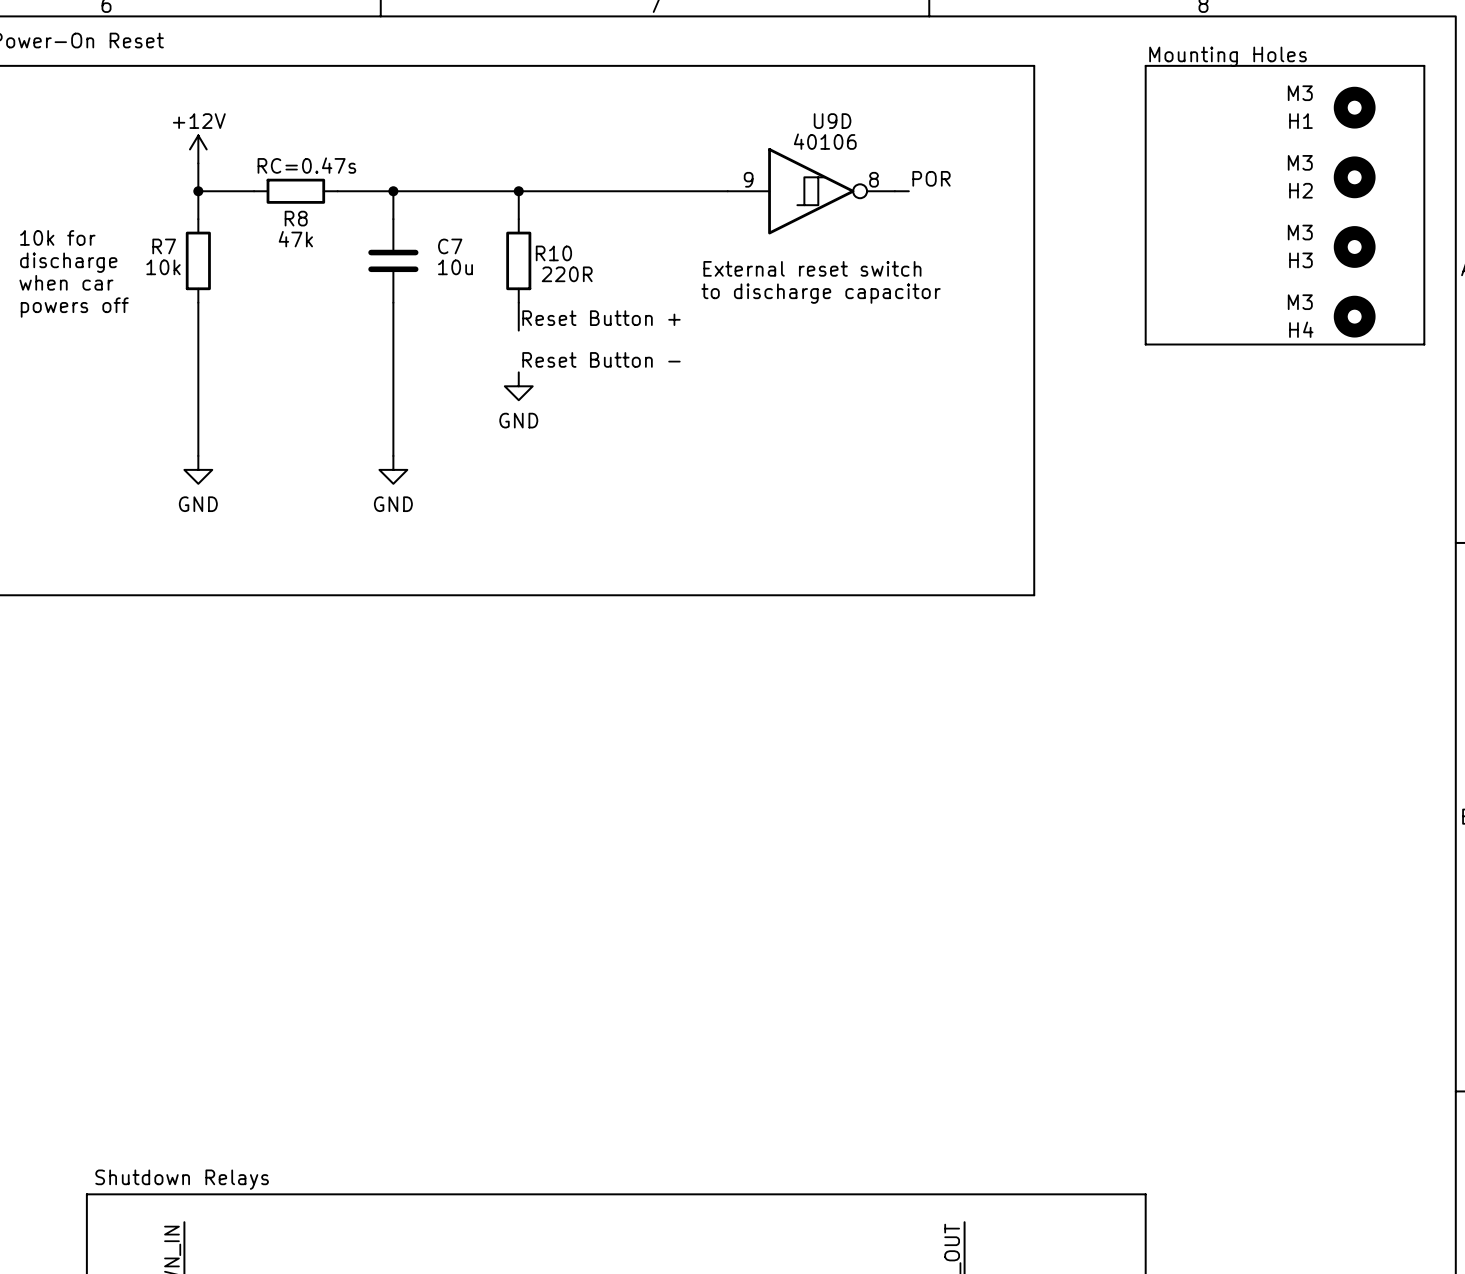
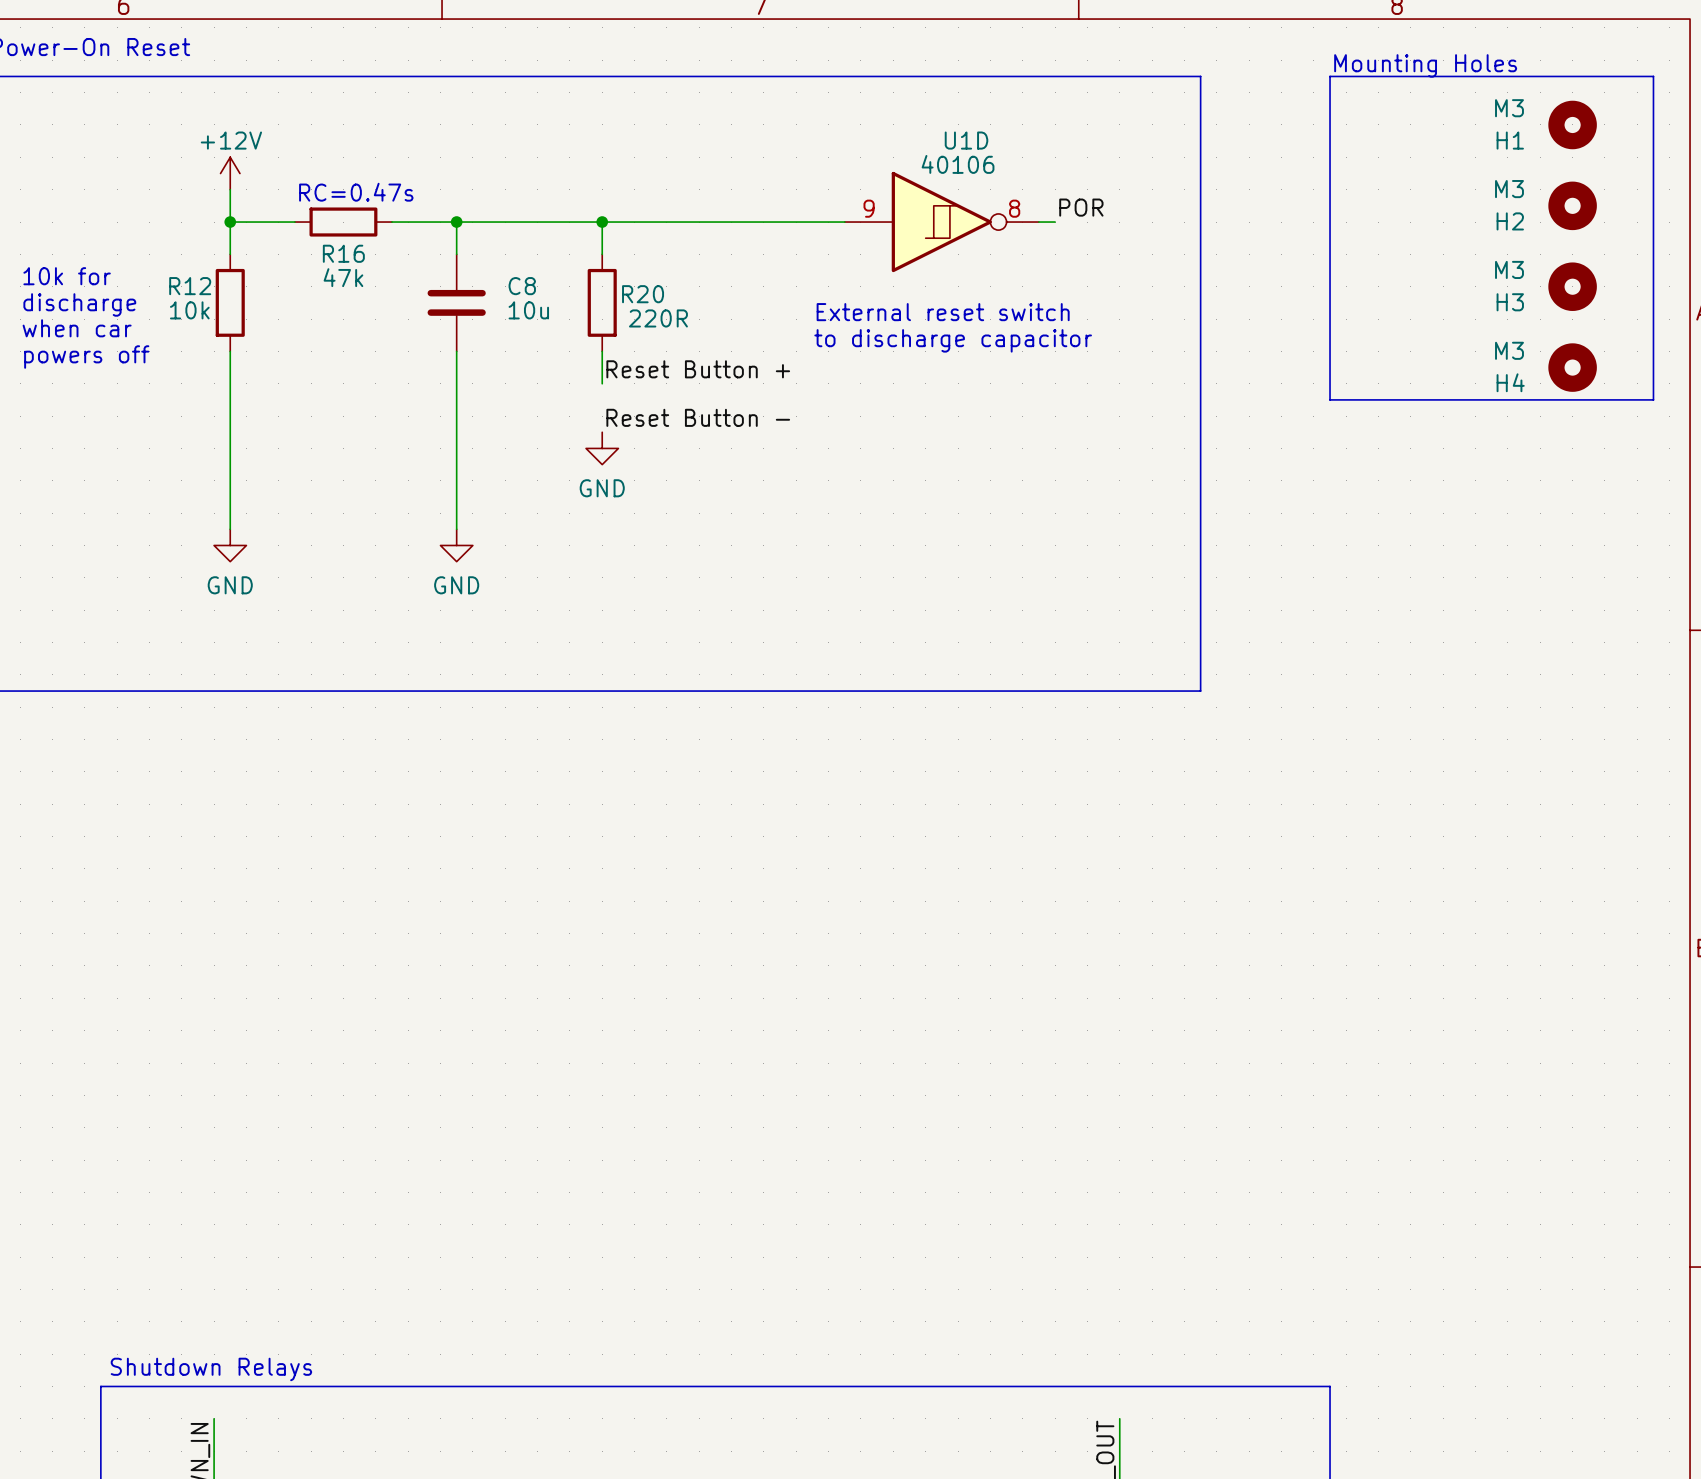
U9D name: U9D (832, 121) -> U1D (966, 140)
R8 name: R8 (296, 218) -> R16 (343, 253)
R7 name: R7 (164, 246) -> R12 (190, 286)
C7 name: C7 (450, 246) -> C8 (522, 286)
R10 name: R10 (553, 253) -> R20 (643, 294)

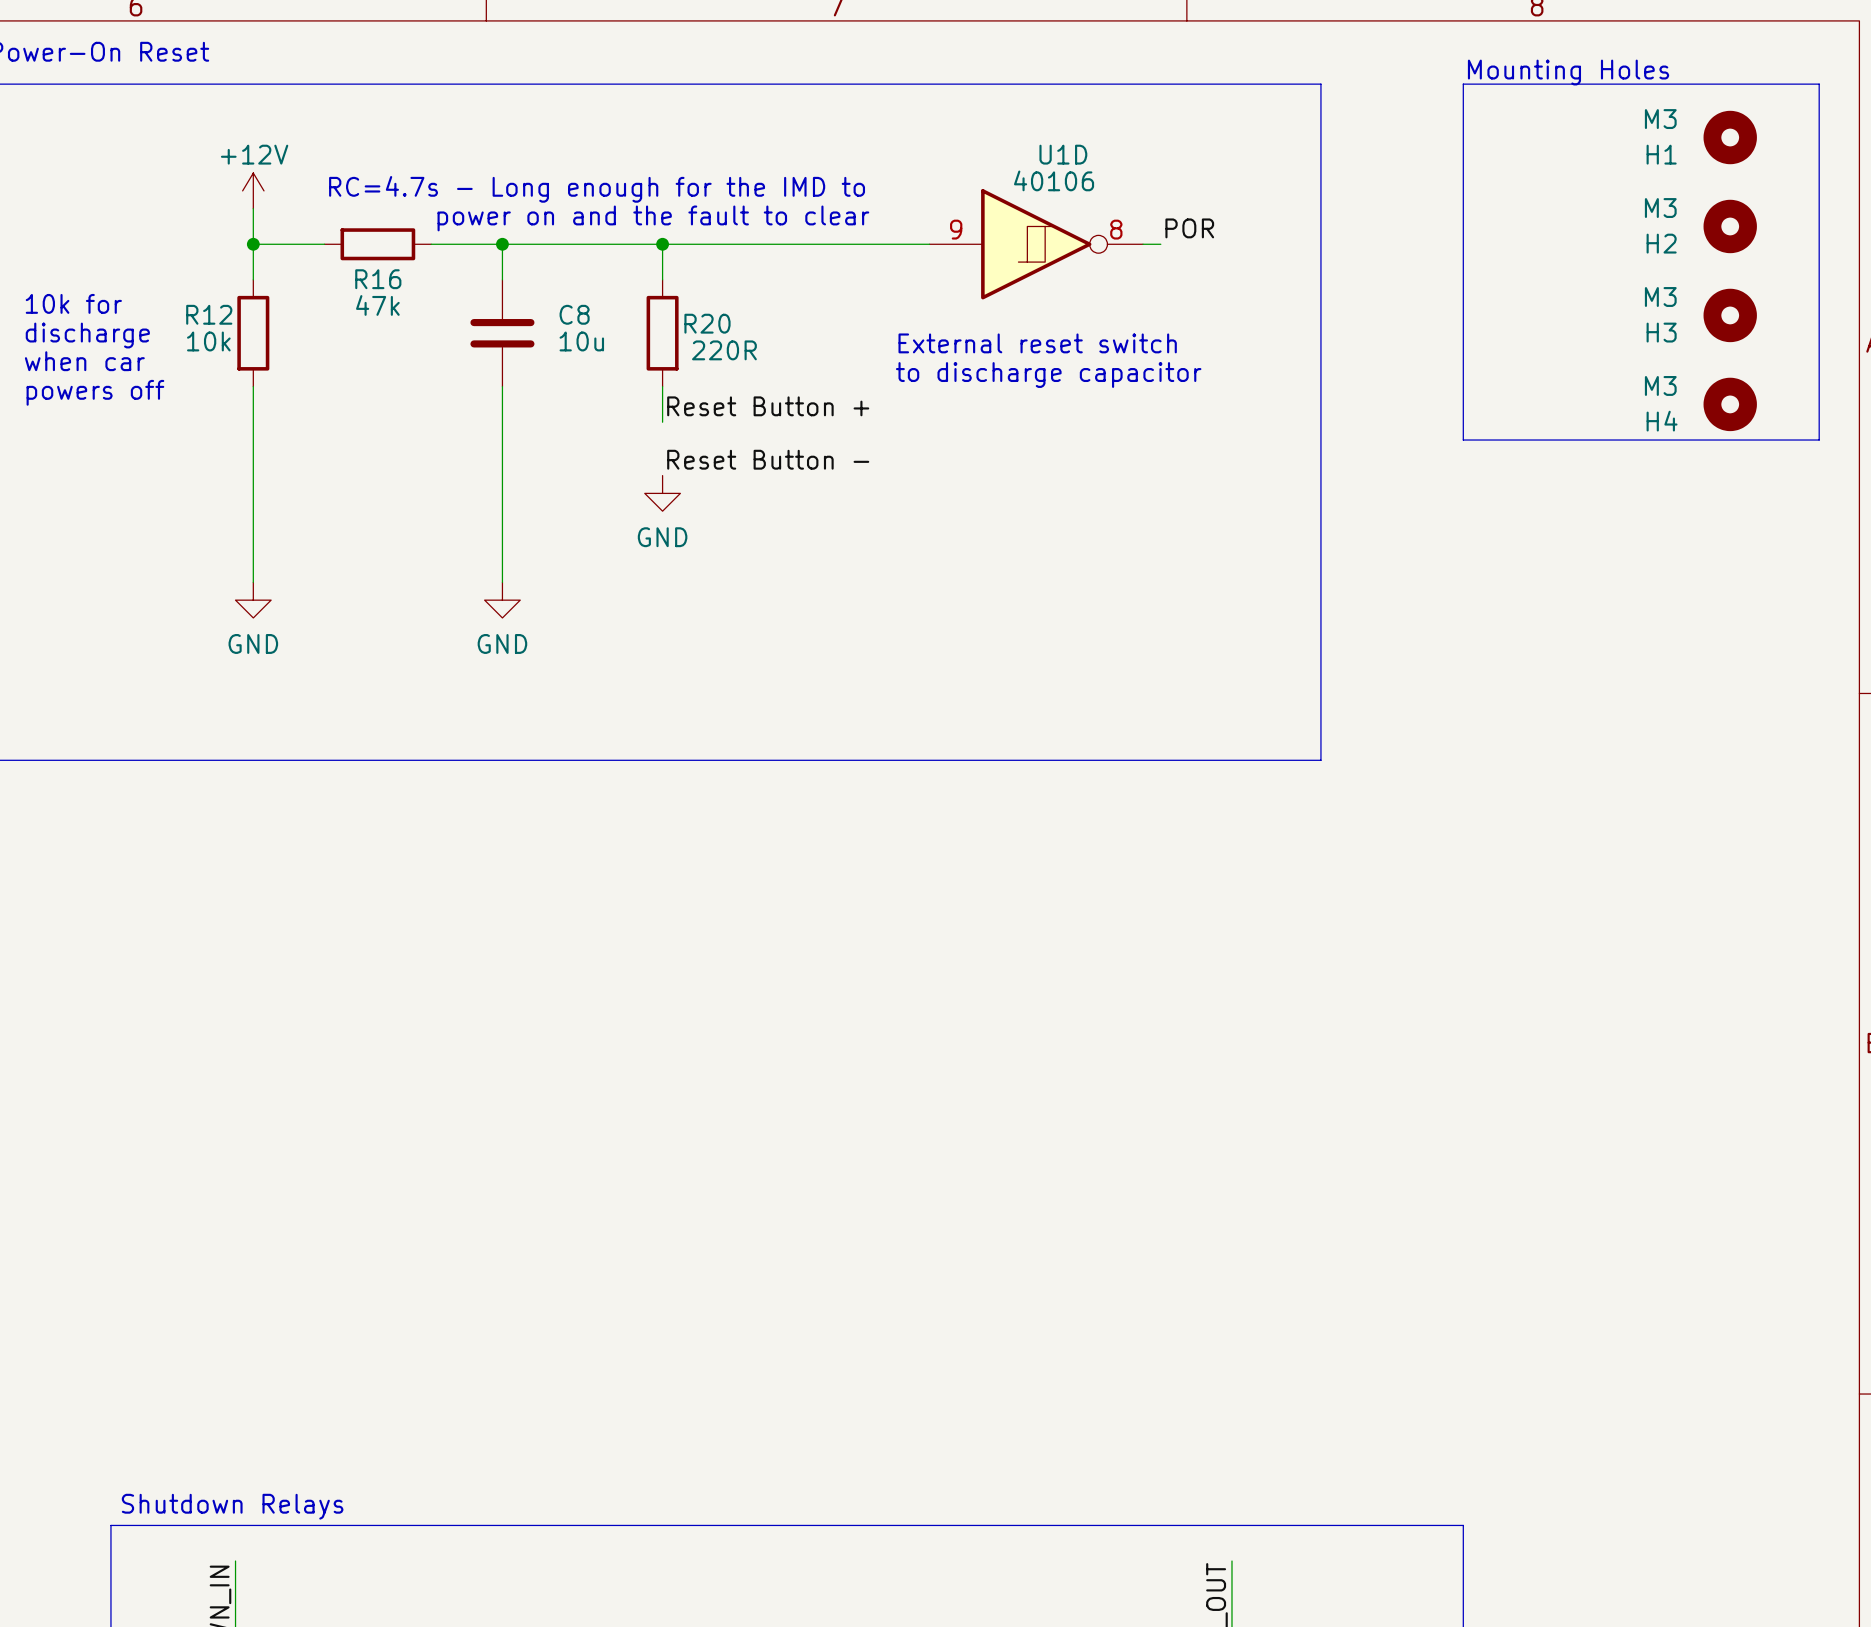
text: none -> RC=4.7s - Long enough for the IMD to (597, 189)
text: RC=0.47s (356, 192) -> power on and the fault to clear (653, 218)

